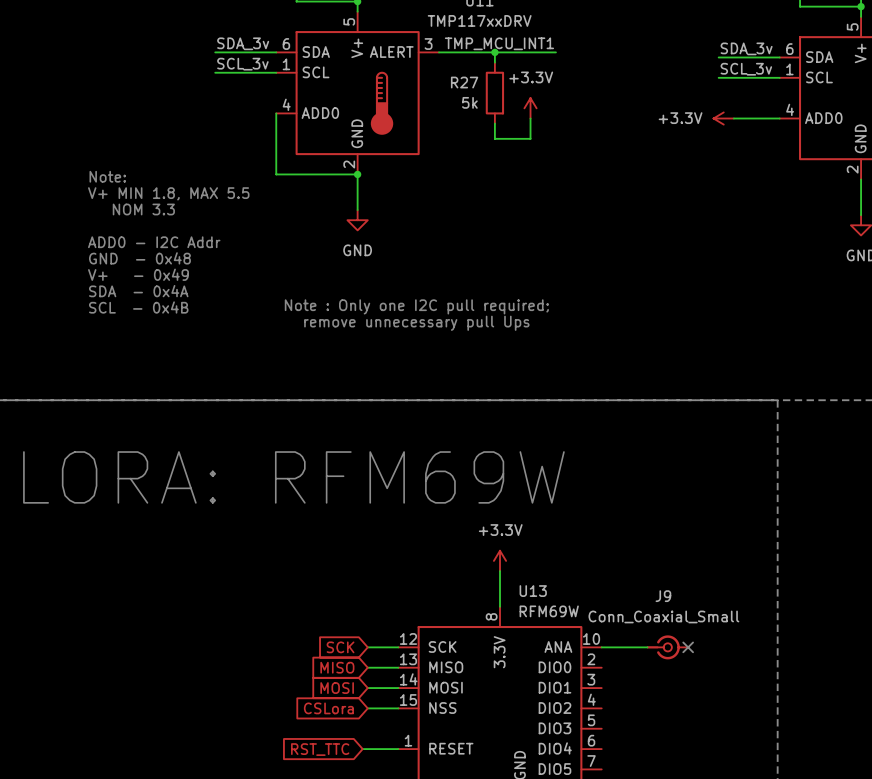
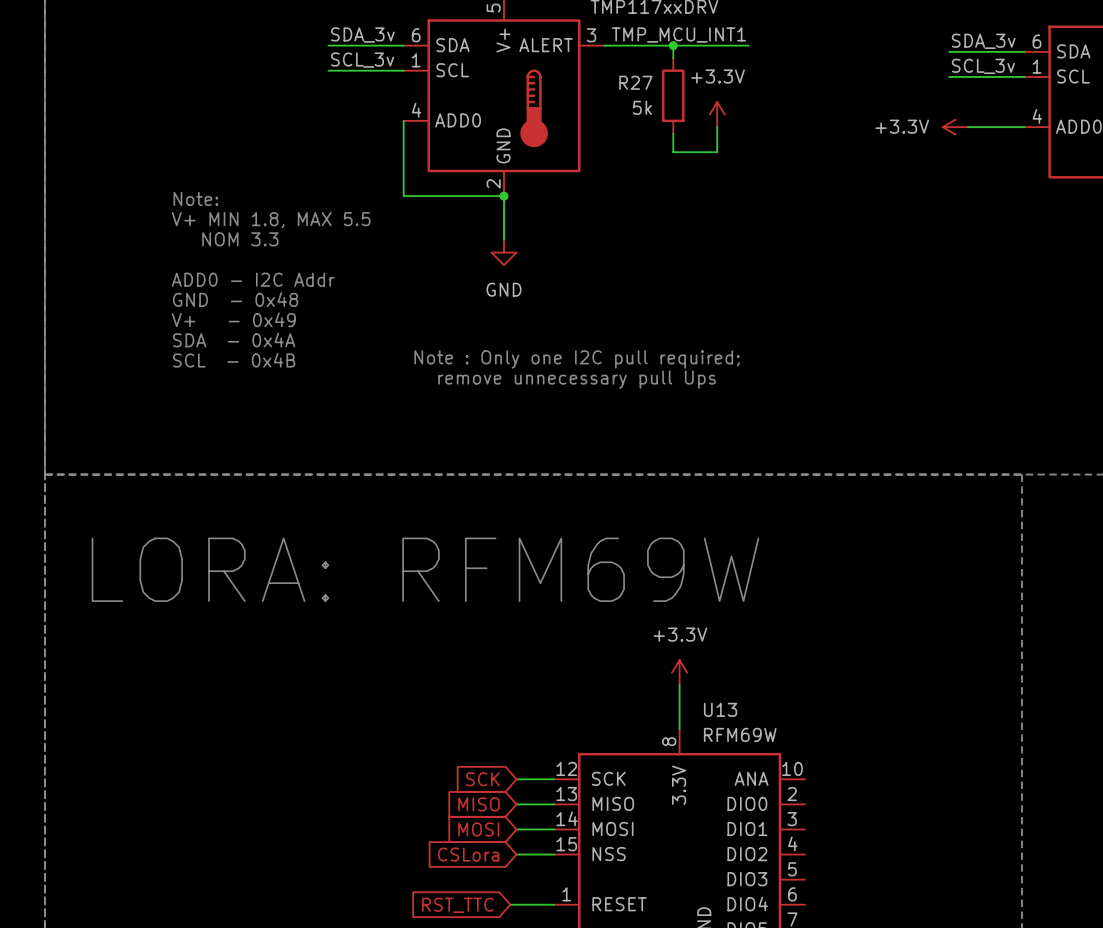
wire: (601, 647) (647, 647) -> none
J9: Conn_Coaxial_Small (667, 647) -> none
no-connect mark: (688, 647) -> none

